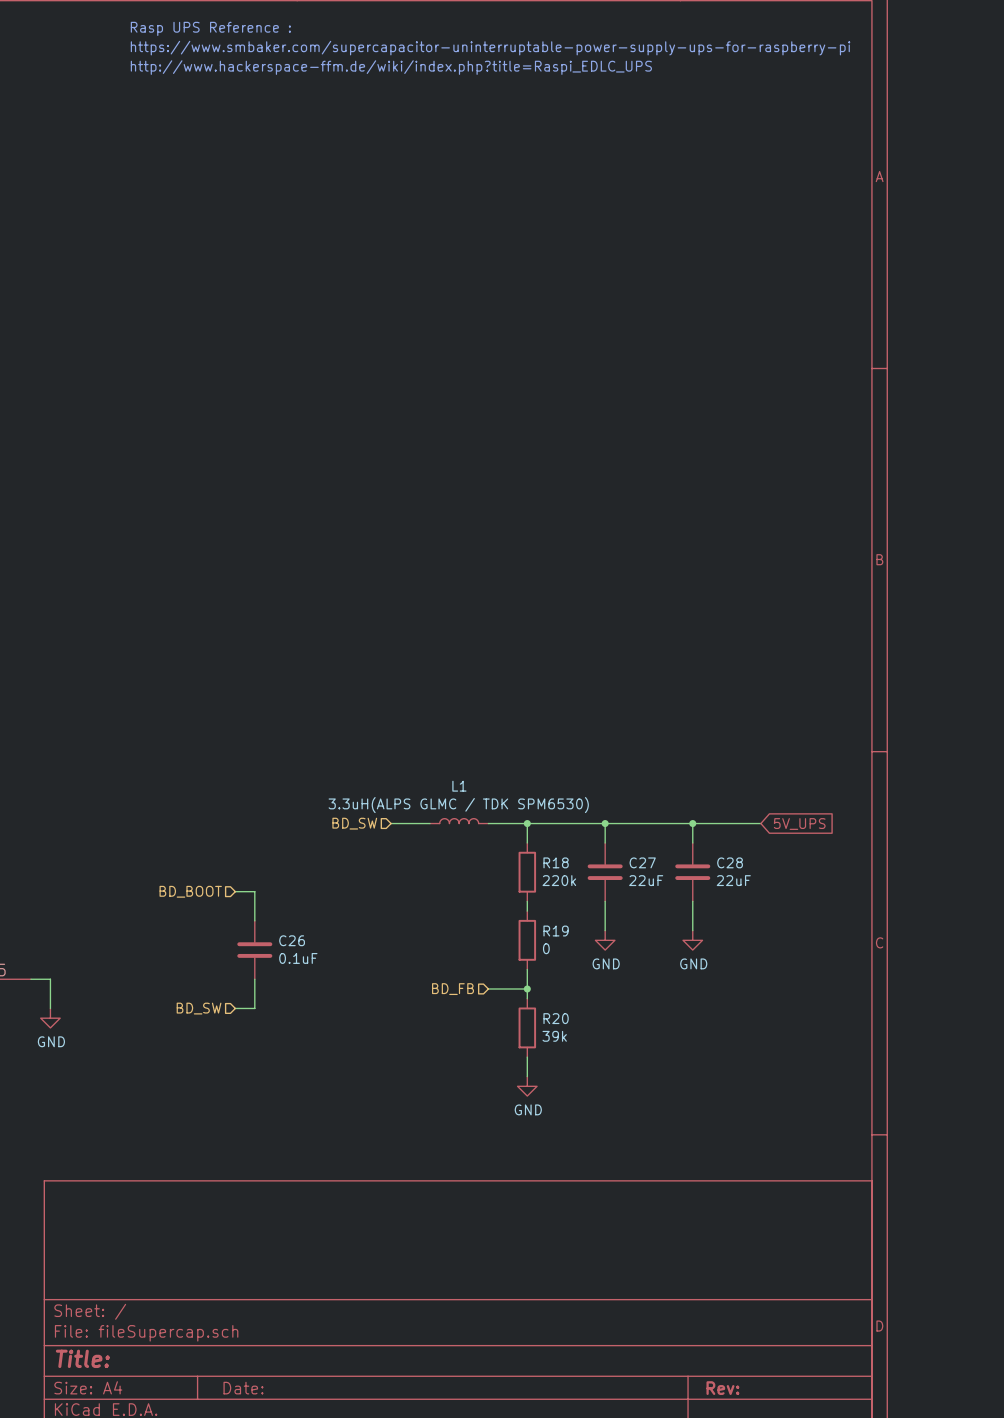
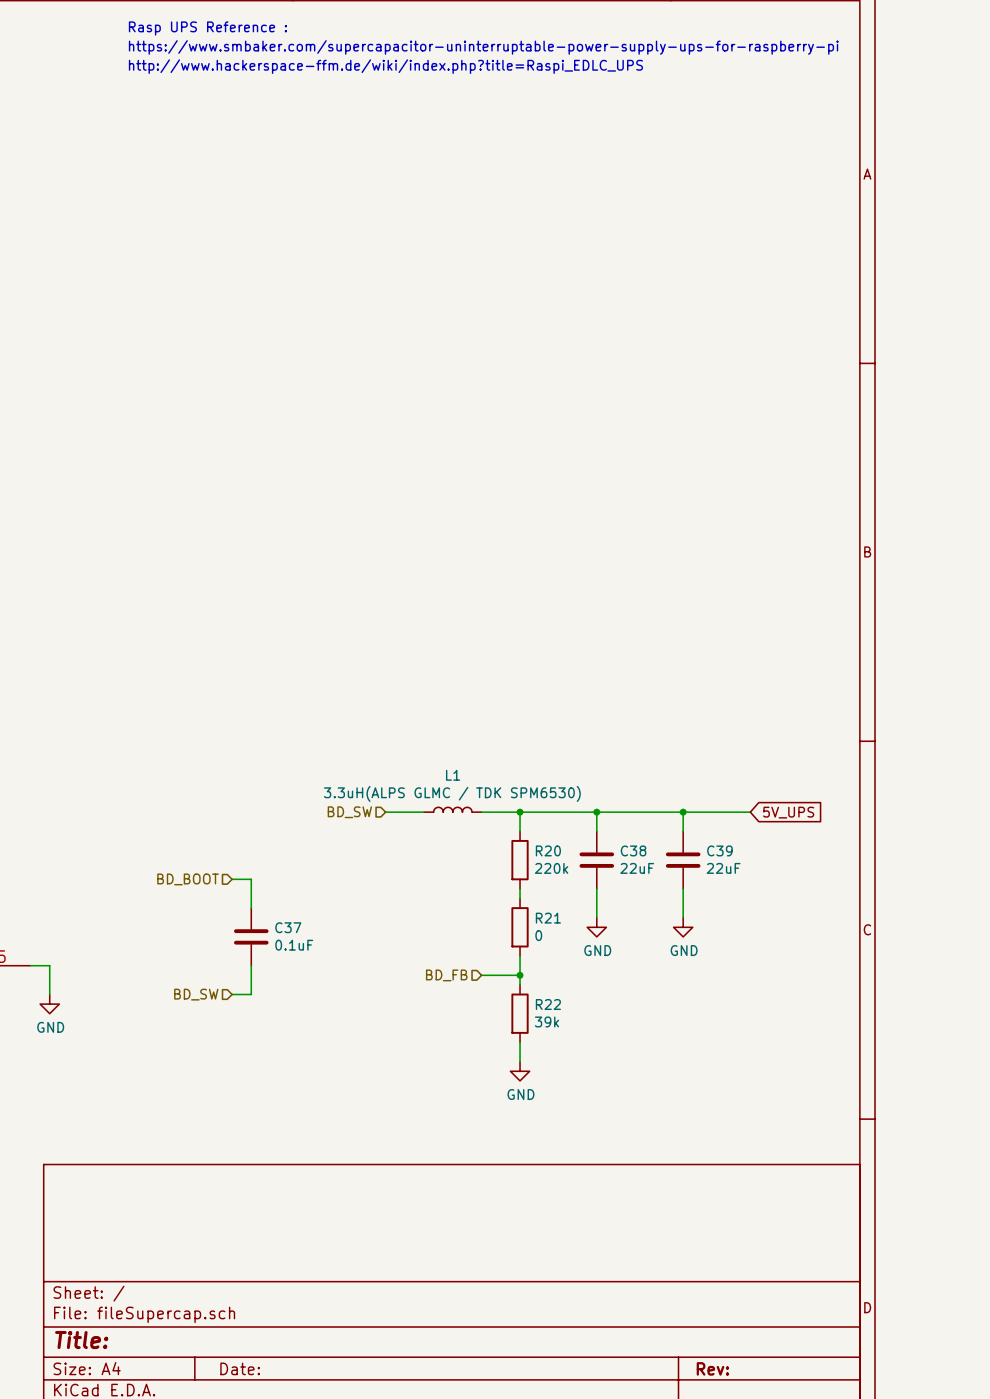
R18 name: R18 (556, 862) -> R20 (548, 850)
C27 name: C27 (642, 862) -> C38 (633, 850)
C28 name: C28 (730, 862) -> C39 (719, 850)
R19 name: R19 (556, 931) -> R21 (548, 918)
C26 name: C26 (292, 940) -> C37 (288, 927)
R20 name: R20 (556, 1018) -> R22 (548, 1004)

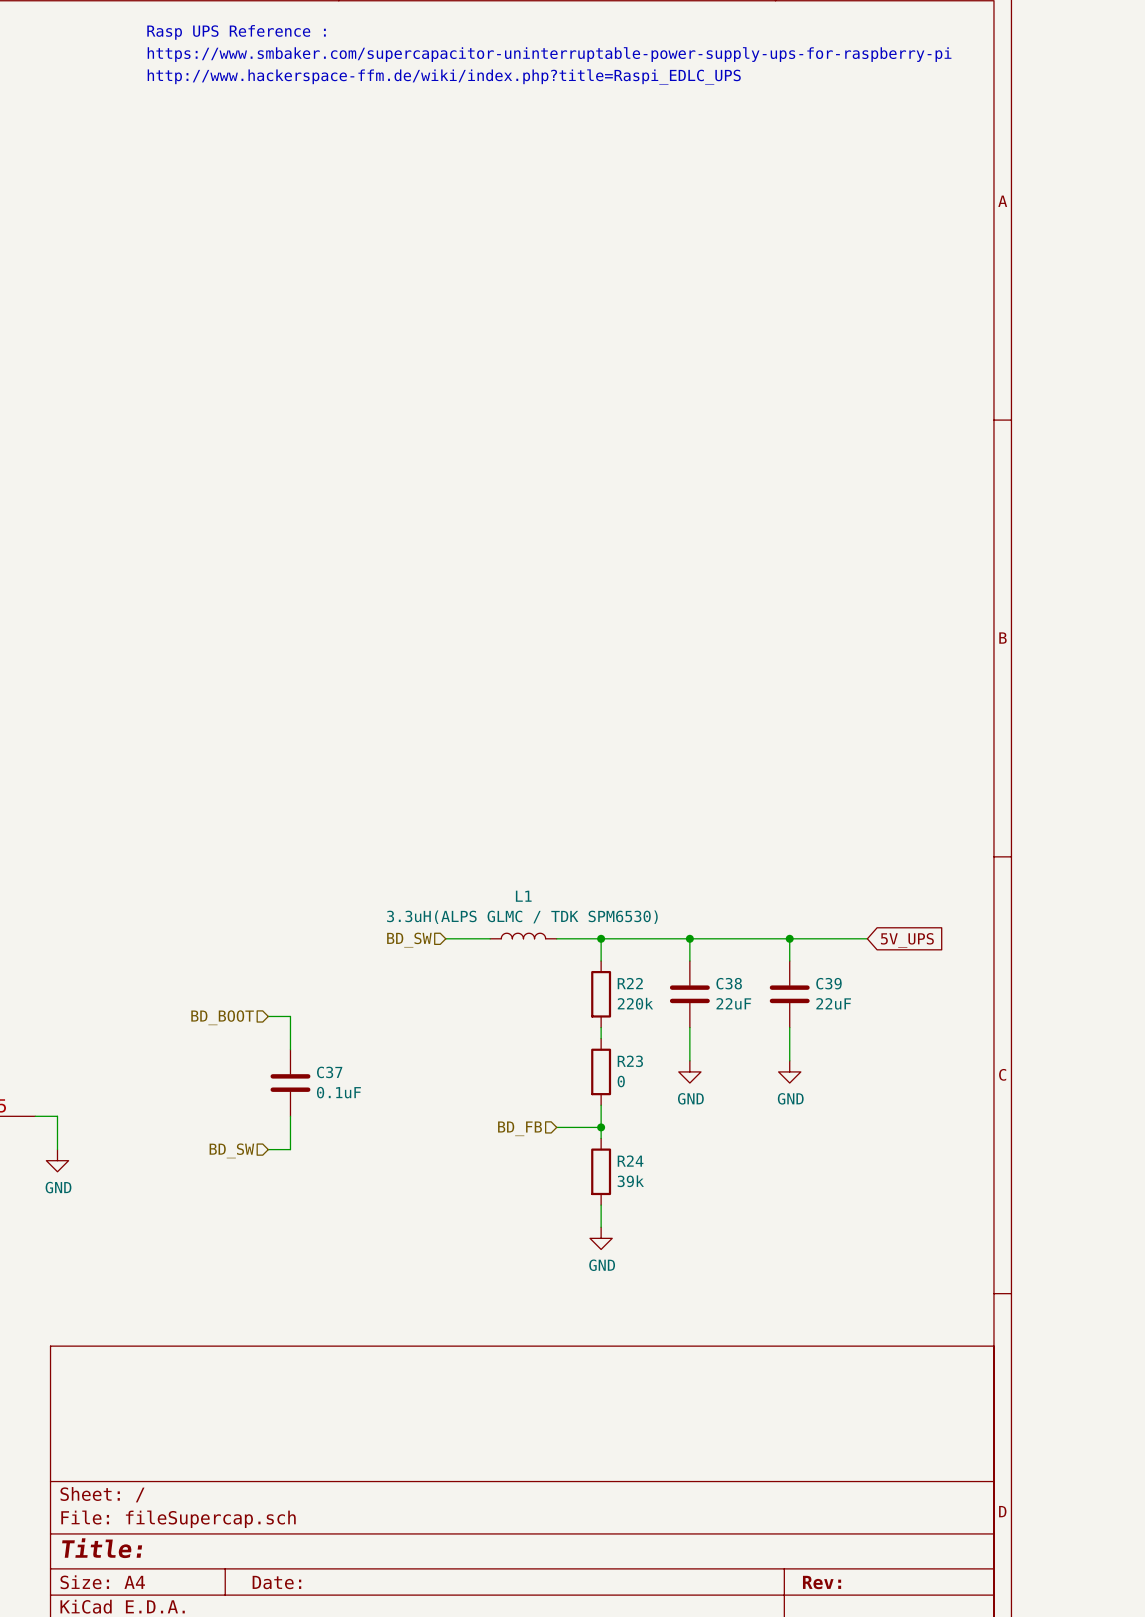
R20 name: R20 (548, 850) -> R22 (630, 983)
R21 name: R21 (548, 918) -> R23 (630, 1061)
R22 name: R22 (548, 1004) -> R24 (630, 1161)

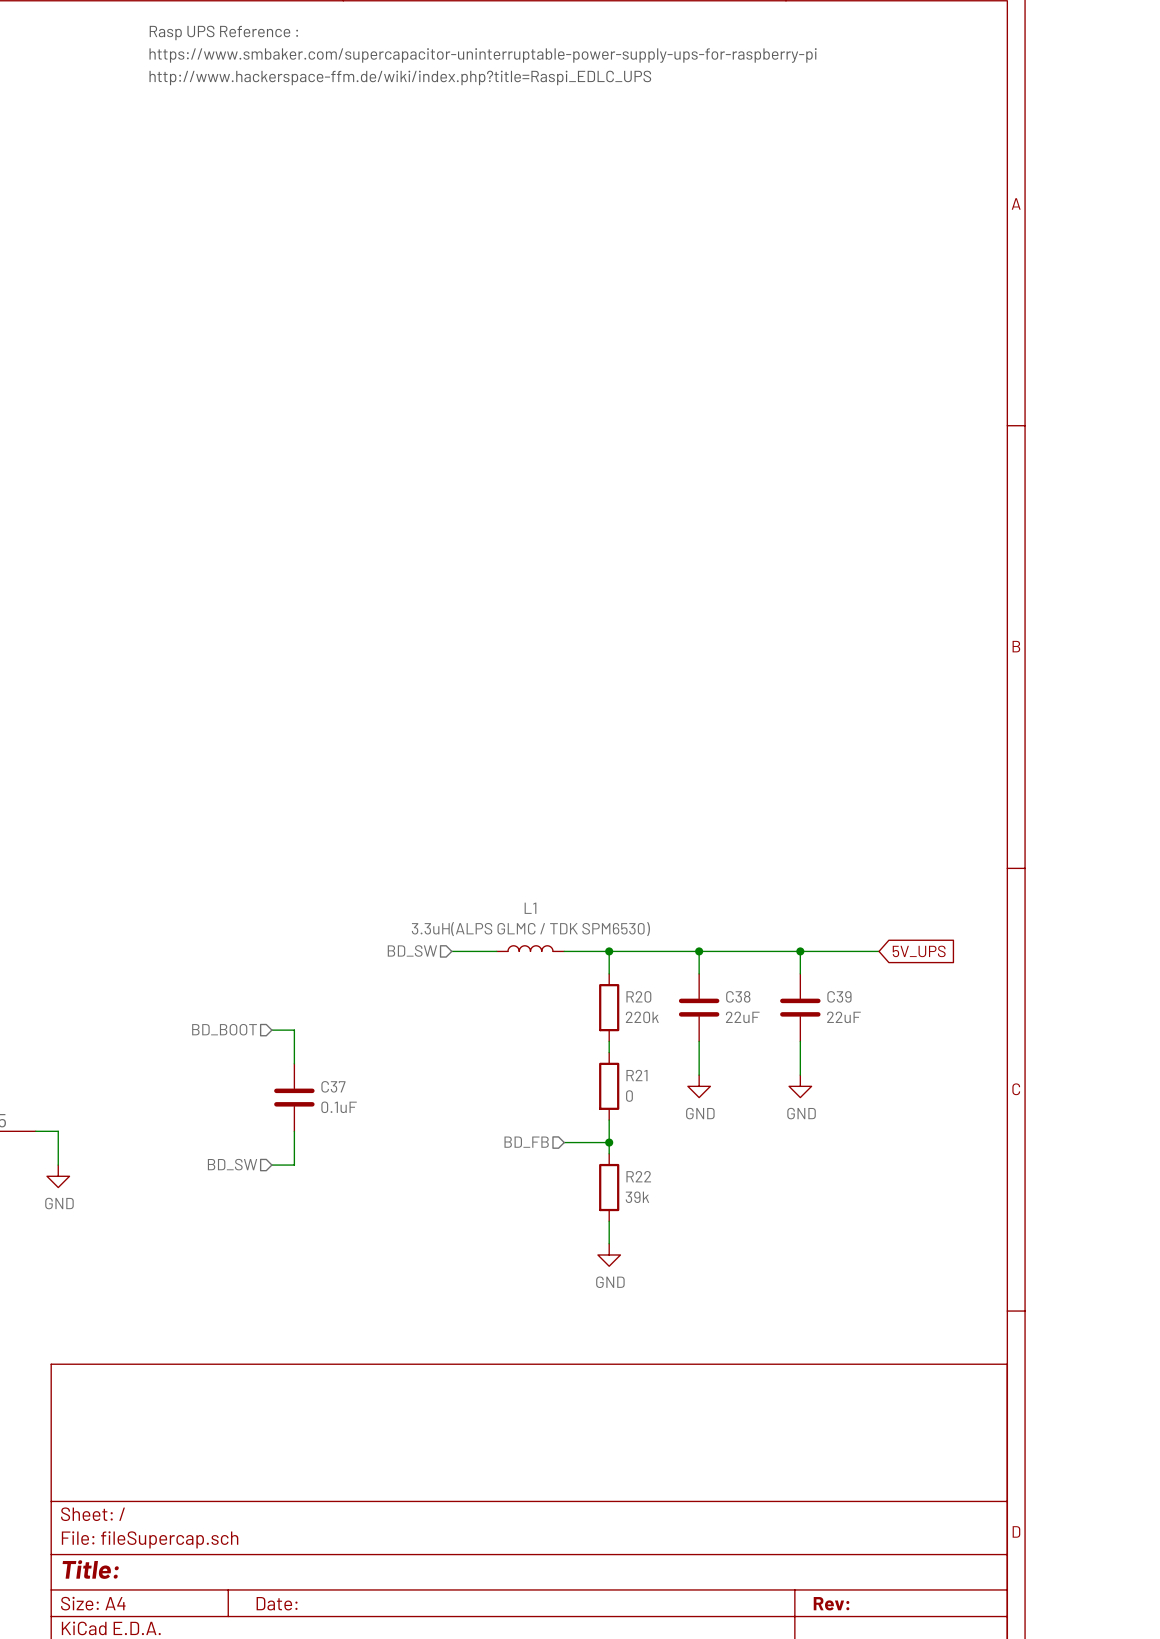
R22 name: R22 (630, 983) -> R20 (638, 996)
R23 name: R23 (630, 1061) -> R21 (636, 1075)
R24 name: R24 (630, 1161) -> R22 (638, 1176)

